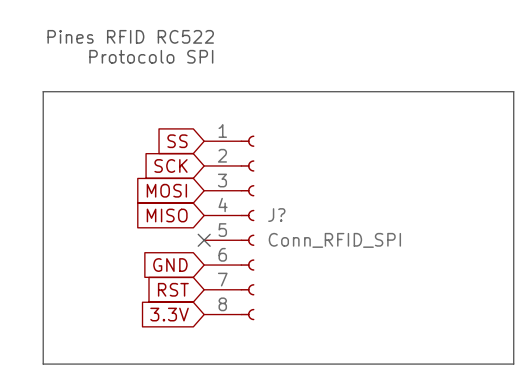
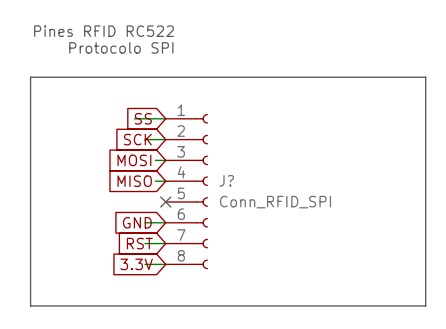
wire: none -> (134, 118) (165, 118)
wire: none -> (144, 139) (165, 139)
wire: none -> (155, 160) (165, 160)
wire: none -> (155, 181) (165, 181)
wire: none -> (144, 222) (165, 222)
wire: none -> (144, 243) (165, 243)
wire: none -> (144, 264) (165, 264)

